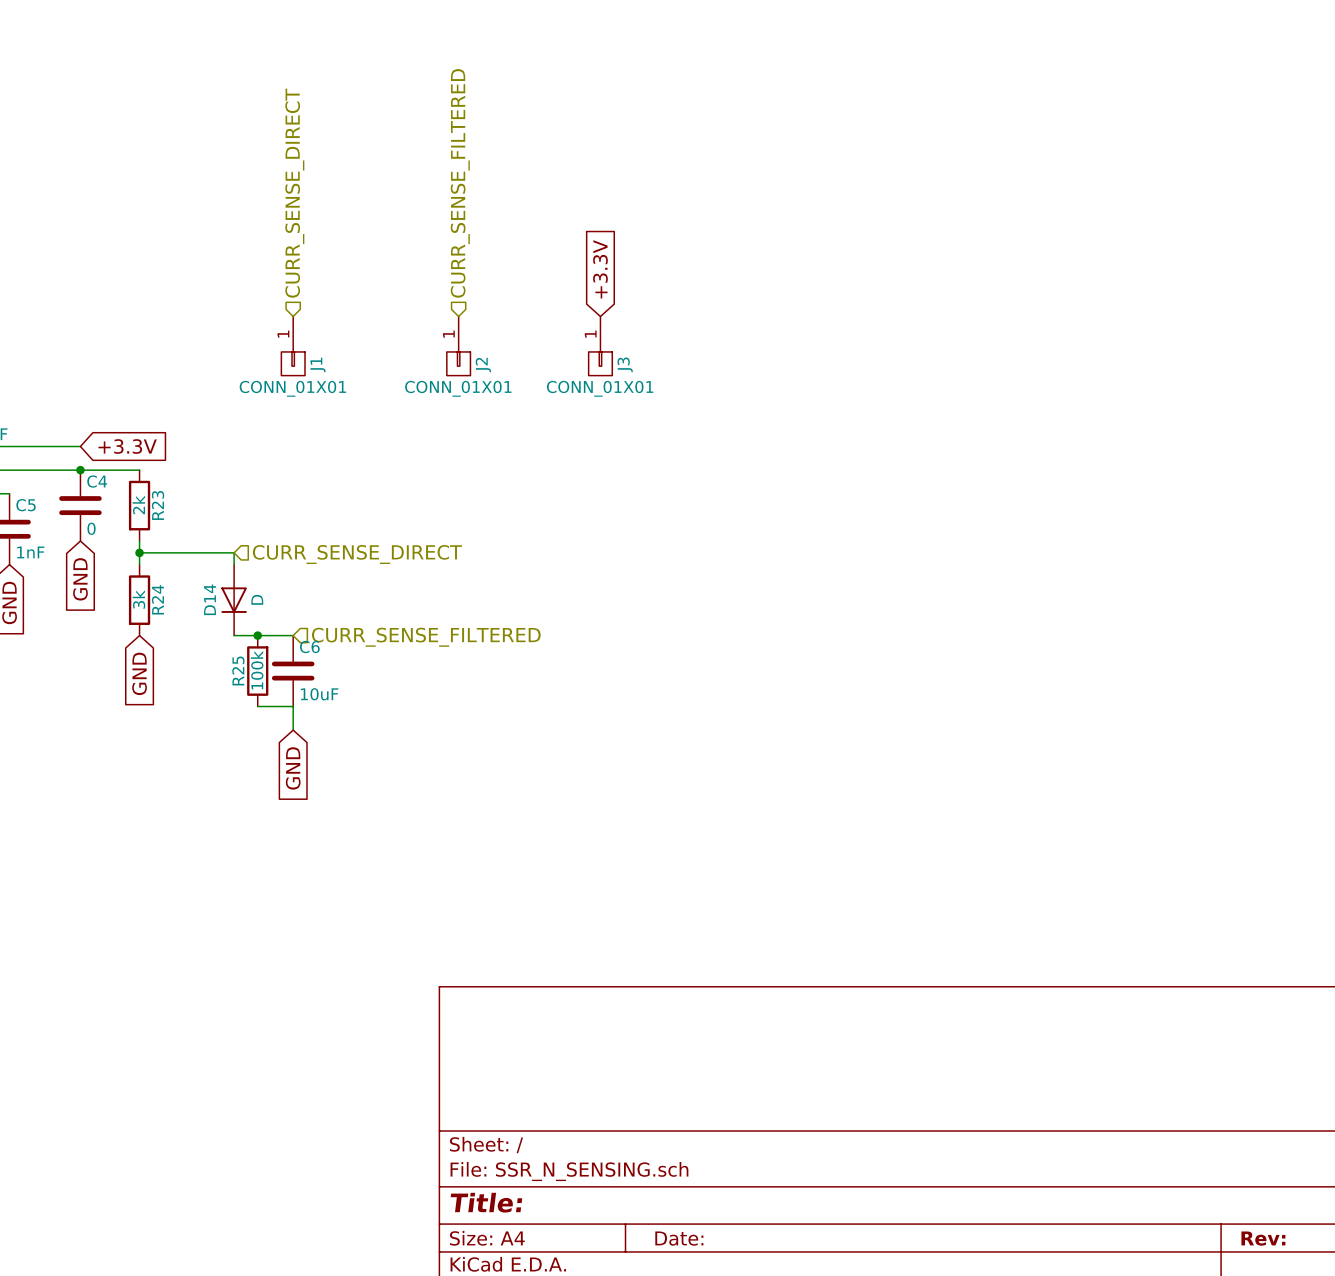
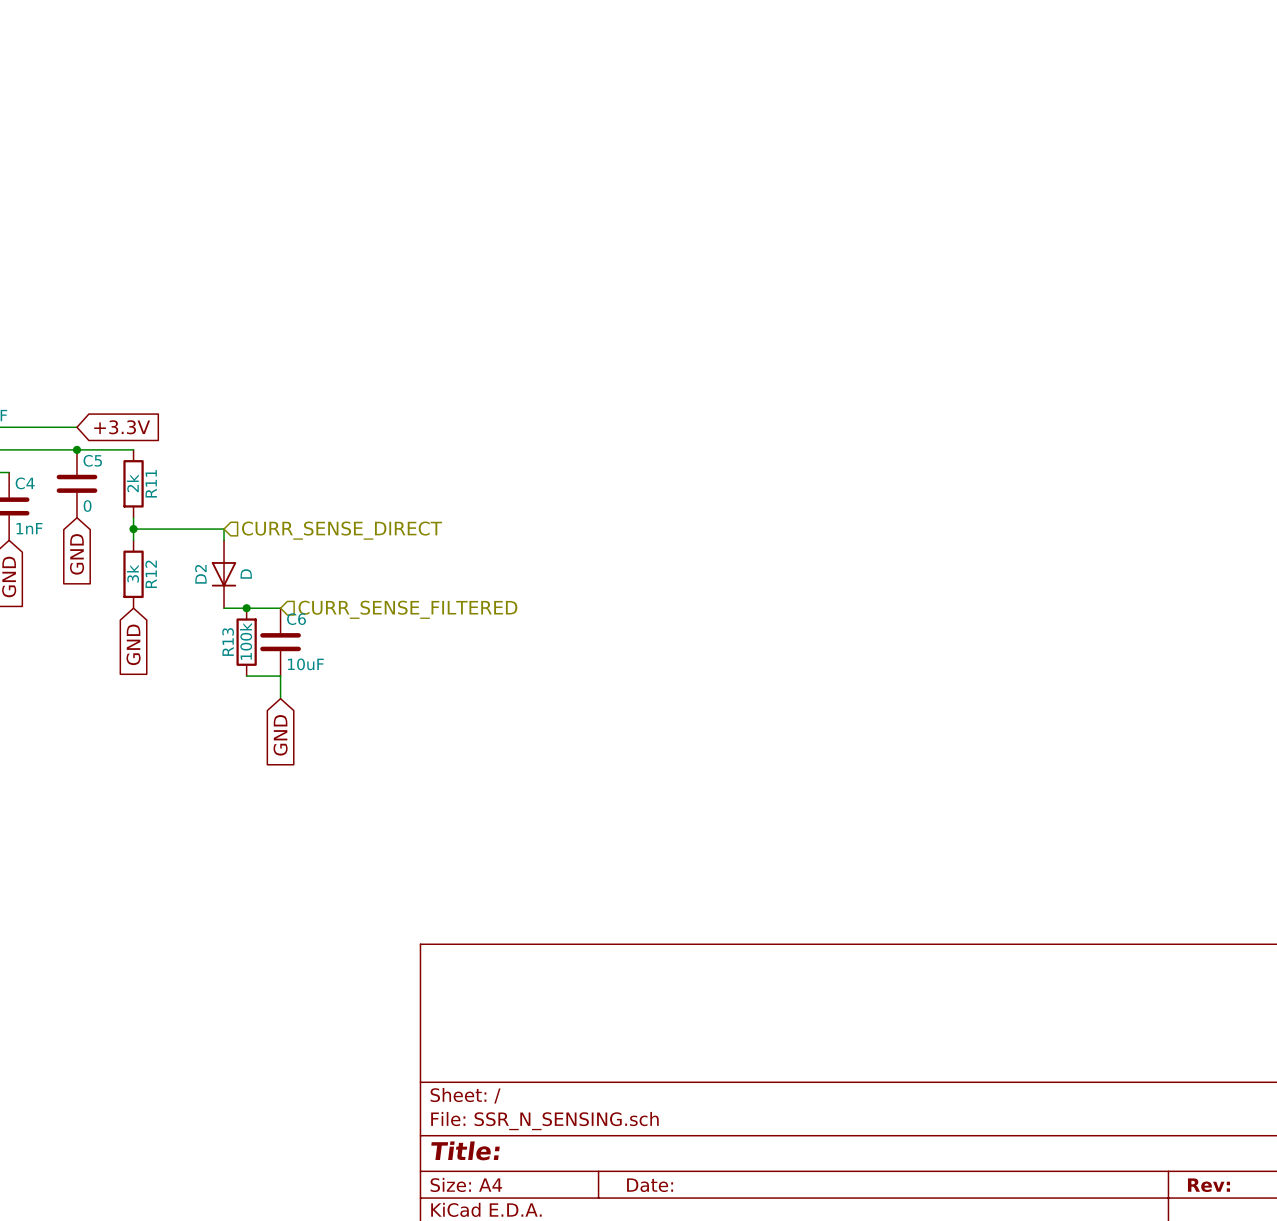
hierarchical label: CURR_SENSE_FILTERED (460, 183) -> none
hierarchical label: CURR_SENSE_DIRECT (294, 193) -> none
global label: +3.3V (600, 269) -> none
J1: CONN_01X01 (293, 346) -> none
J2: CONN_01X01 (458, 346) -> none
J3: CONN_01X01 (600, 346) -> none
C4 name: C4 (97, 481) -> C5 (92, 460)
C5 name: C5 (26, 505) -> C4 (25, 483)
R23 name: R23 (158, 505) -> R11 (151, 483)
R24 name: R24 (157, 599) -> R12 (151, 574)
D14 name: D14 (210, 599) -> D2 (200, 574)
R25 name: R25 (238, 670) -> R13 (228, 642)

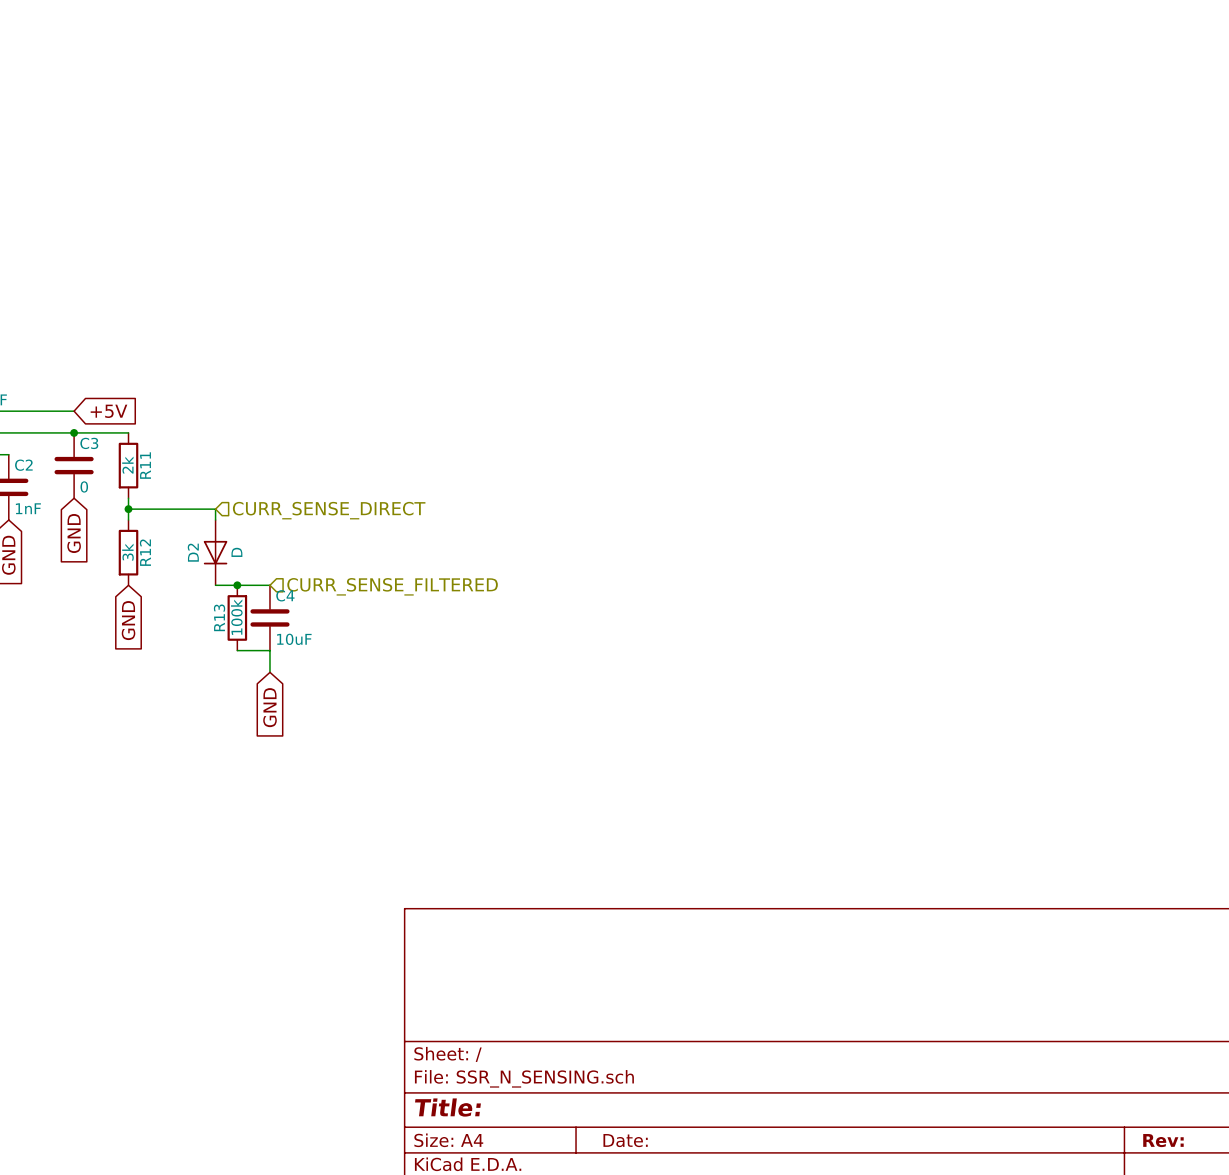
global label: +3.3V (122, 427) -> +5V (108, 411)
C5 name: C5 (92, 460) -> C3 (89, 443)
C4 name: C4 (25, 483) -> C2 (23, 465)
C6 name: C6 (296, 619) -> C4 (285, 595)

